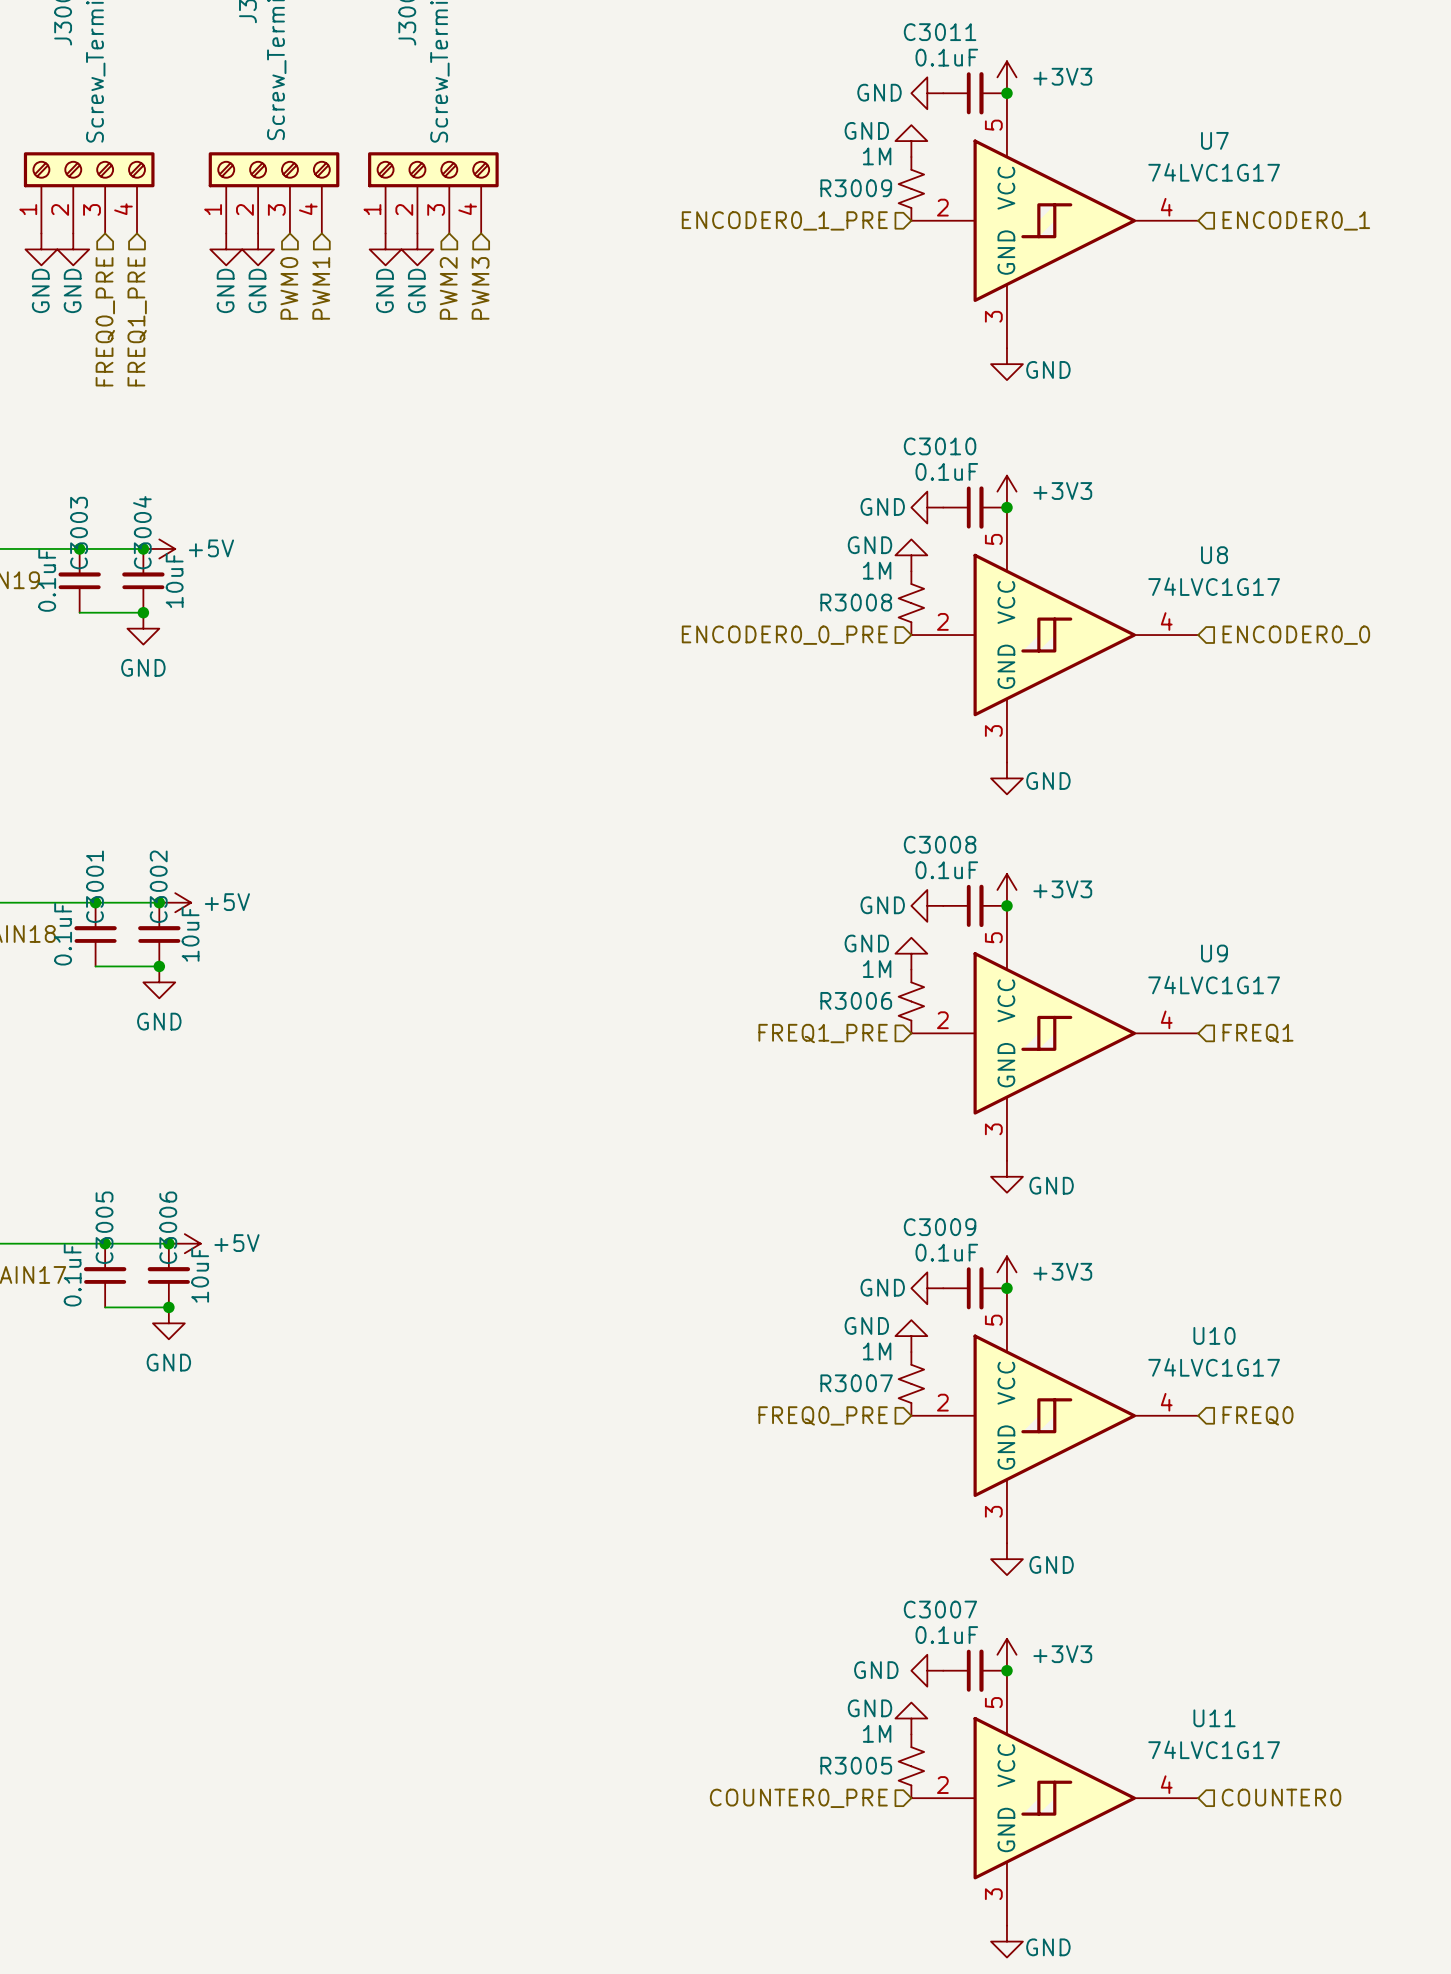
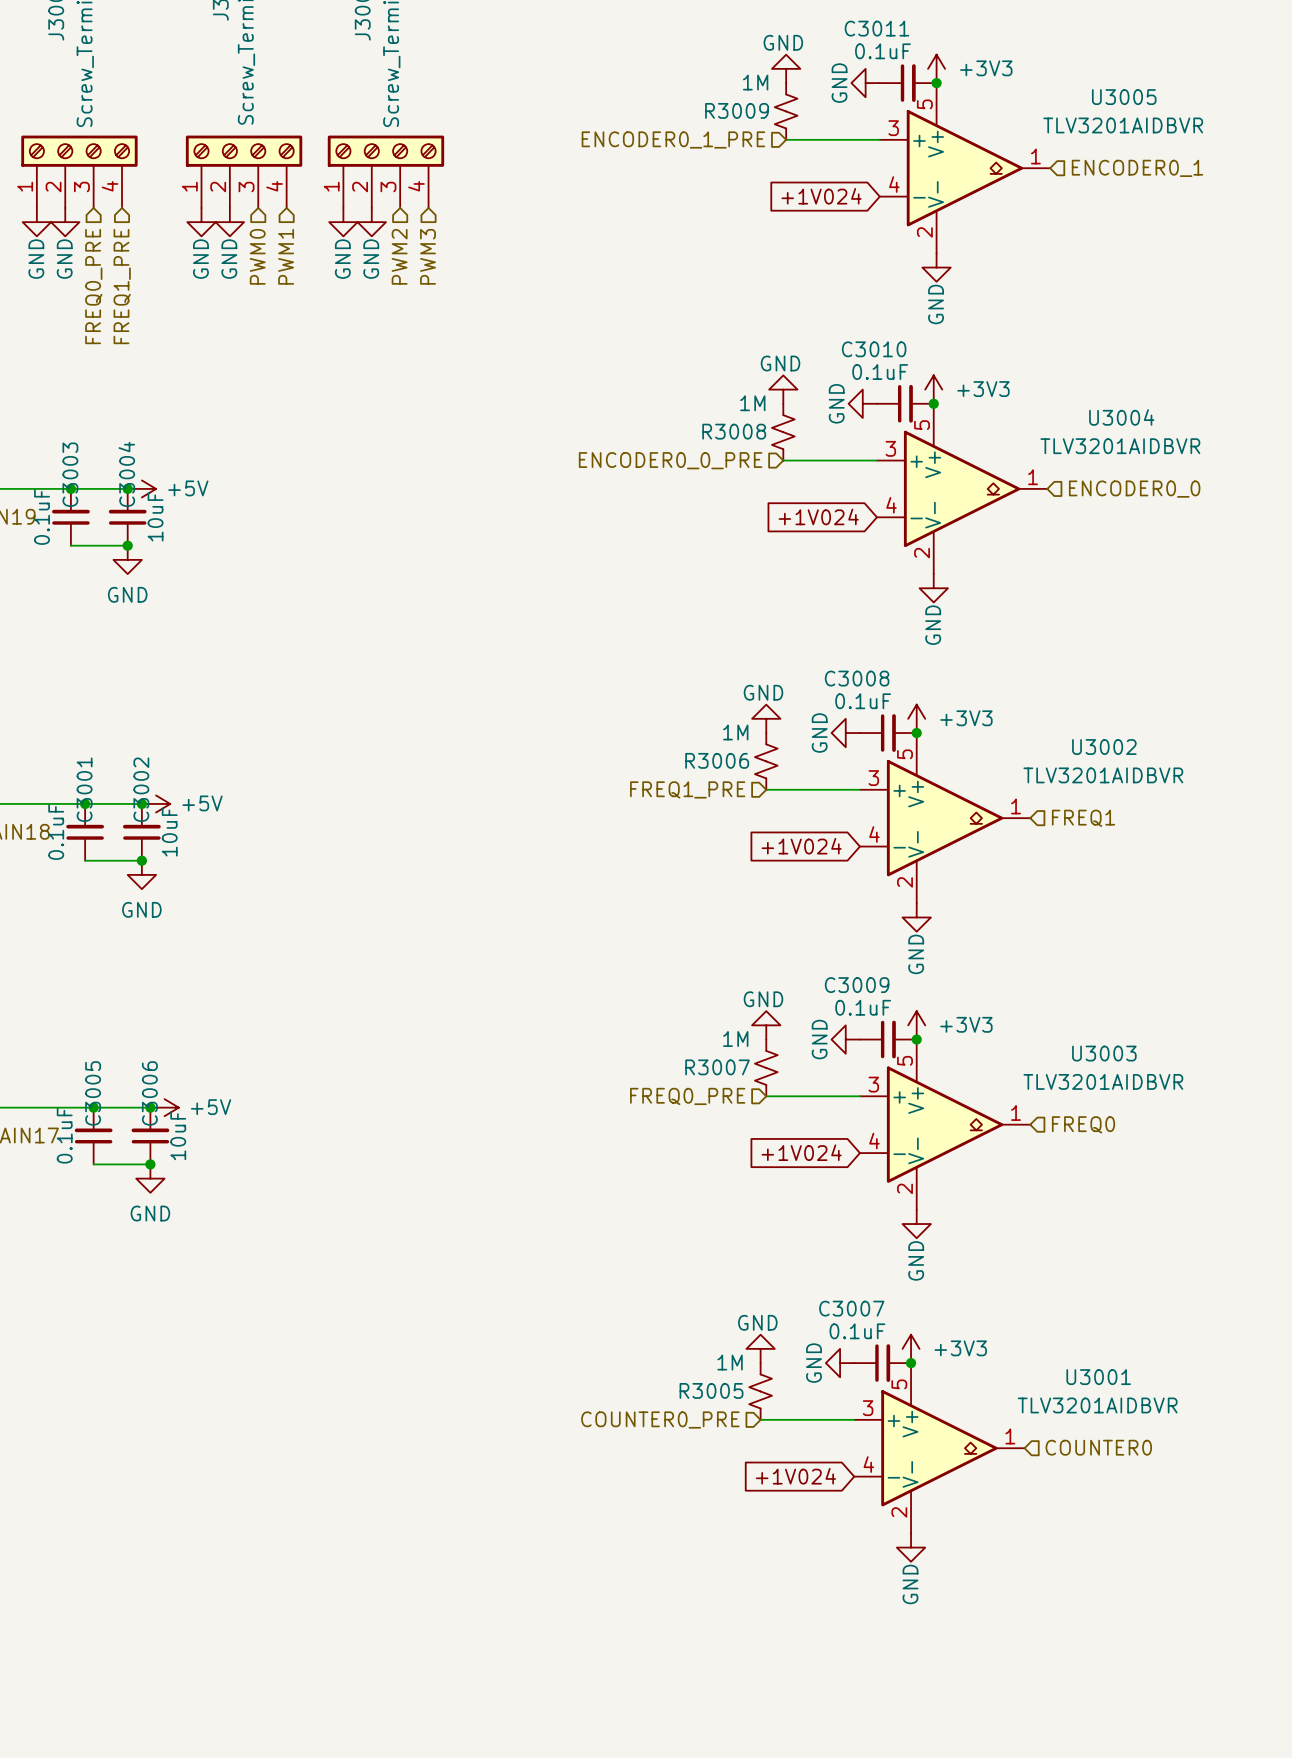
power symbol: none -> GND (786, 68)
power symbol position: +3V3 (1006, 77) -> +3V3 (936, 68)
power symbol: GND (927, 93) -> none
power symbol: none -> GND (865, 83)
C3011 position: (975, 93) -> (908, 83)
junction position: (1006, 93) -> (936, 83)
power symbol: GND (911, 141) -> none
wire: none -> (786, 139) (879, 139)
R3009 position: (911, 188) -> (786, 111)
U3005: none -> TLV3201AIDBVR (964, 168)
hierarchical label position: ENCODER0_1_PRE (784, 220) -> ENCODER0_1_PRE (673, 139)
global label: none -> +1V024 (821, 196)
U7: 74LVC1G17 (1054, 220) -> none
hierarchical label position: ENCODER0_1 (1296, 220) -> ENCODER0_1 (1137, 168)
power symbol: none -> GND (936, 267)
power symbol: GND (1006, 364) -> none
power symbol: none -> GND (783, 389)
power symbol: none -> GND (862, 403)
power symbol position: +3V3 (1006, 491) -> +3V3 (933, 389)
power symbol: GND (927, 507) -> none
C3010 position: (975, 507) -> (905, 403)
junction position: (1006, 507) -> (933, 403)
wire: none -> (783, 460) (876, 460)
U3004: none -> TLV3201AIDBVR (962, 488)
power symbol: GND (911, 555) -> none
global label: none -> +1V024 (818, 516)
R3008 position: (911, 603) -> (783, 432)
hierarchical label position: ENCODER0_0_PRE (784, 635) -> ENCODER0_0_PRE (670, 460)
U8: 74LVC1G17 (1054, 635) -> none
hierarchical label position: ENCODER0_0 (1296, 635) -> ENCODER0_0 (1134, 489)
power symbol: none -> GND (933, 588)
power symbol: GND (1006, 778) -> none
power symbol: none -> GND (766, 718)
power symbol: none -> GND (845, 733)
junction: none -> (916, 733)
wire: none -> (766, 789) (859, 789)
power symbol position: +3V3 (1006, 889) -> +3V3 (916, 718)
power symbol: GND (927, 905) -> none
C3008 position: (975, 905) -> (888, 733)
junction: (1006, 905) -> none
U3002: none -> TLV3201AIDBVR (945, 818)
global label: none -> +1V024 (801, 846)
power symbol: GND (911, 953) -> none
R3006 position: (911, 1001) -> (766, 761)
power symbol: none -> GND (916, 917)
hierarchical label position: FREQ1_PRE (823, 1033) -> FREQ1_PRE (687, 789)
U9: 74LVC1G17 (1054, 1033) -> none
hierarchical label position: FREQ1 (1257, 1033) -> FREQ1 (1083, 818)
power symbol: none -> GND (766, 1025)
power symbol: none -> +3V3 (916, 1025)
junction: none -> (916, 1039)
power symbol rotation: 0° (1006, 1176) -> 90° clockwise (845, 1039)
power symbol position: GND (1006, 1176) -> GND (845, 1039)
power symbol text position: GND (1051, 1185) -> GND (819, 1039)
wire: none -> (766, 1096) (859, 1096)
U3003: none -> TLV3201AIDBVR (945, 1124)
power symbol: +3V3 (1006, 1272) -> none
power symbol: GND (927, 1288) -> none
C3009 position: (975, 1288) -> (888, 1039)
junction: (1006, 1288) -> none
global label: none -> +1V024 (801, 1152)
power symbol: GND (911, 1336) -> none
power symbol: none -> GND (916, 1224)
R3007 position: (911, 1383) -> (766, 1067)
hierarchical label position: FREQ0_PRE (823, 1415) -> FREQ0_PRE (687, 1096)
U10: 74LVC1G17 (1054, 1415) -> none
hierarchical label position: FREQ0 (1257, 1415) -> FREQ0 (1083, 1124)
power symbol: none -> GND (760, 1348)
power symbol: none -> +3V3 (911, 1348)
junction: none -> (911, 1363)
power symbol rotation: 0° (1006, 1559) -> 90° clockwise (840, 1363)
power symbol position: GND (1006, 1559) -> GND (840, 1363)
power symbol text position: GND (1051, 1564) -> GND (814, 1363)
wire: none -> (760, 1419) (854, 1419)
U3001: none -> TLV3201AIDBVR (939, 1448)
power symbol: +3V3 (1006, 1654) -> none
global label: none -> +1V024 (795, 1476)
power symbol: GND (927, 1670) -> none
C3007 position: (975, 1670) -> (882, 1363)
junction: (1006, 1670) -> none
power symbol: GND (911, 1718) -> none
power symbol: none -> GND (911, 1547)
R3005 position: (911, 1766) -> (760, 1391)
hierarchical label position: COUNTER0 (1281, 1797) -> COUNTER0 (1098, 1447)
hierarchical label position: COUNTER0_PRE (798, 1798) -> COUNTER0_PRE (660, 1419)
U11: 74LVC1G17 (1054, 1798) -> none
power symbol: GND (1006, 1941) -> none

